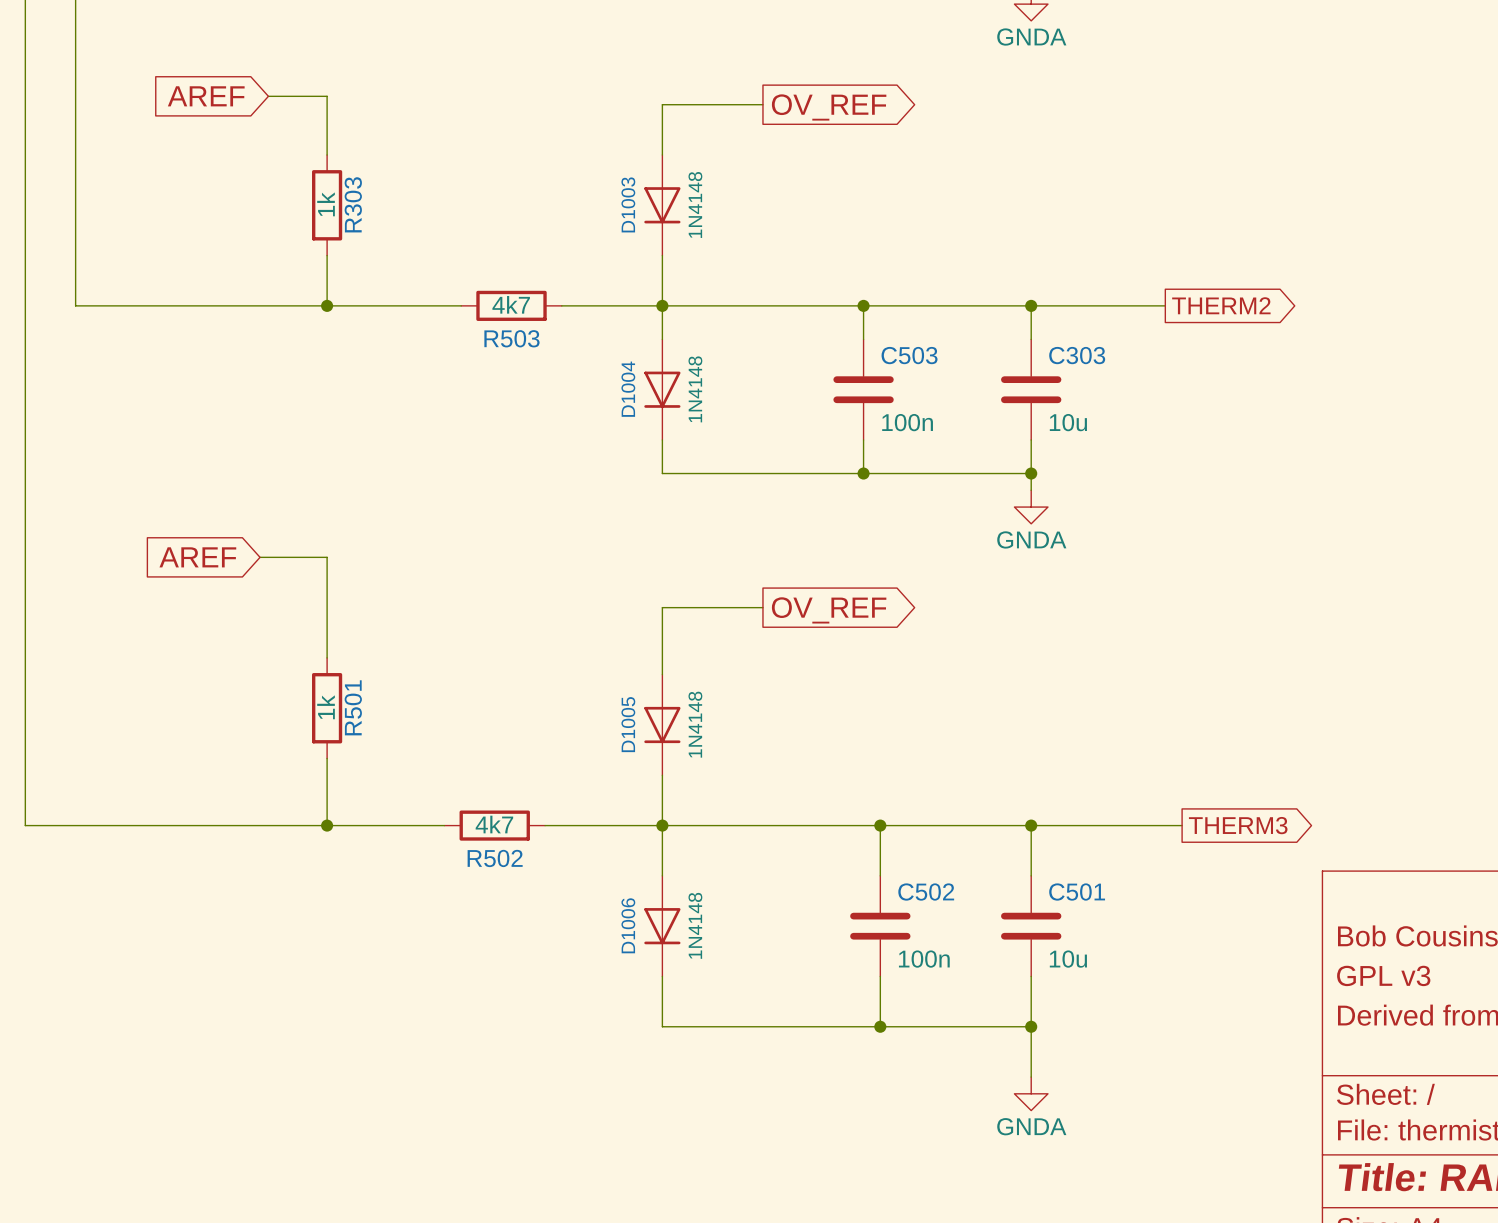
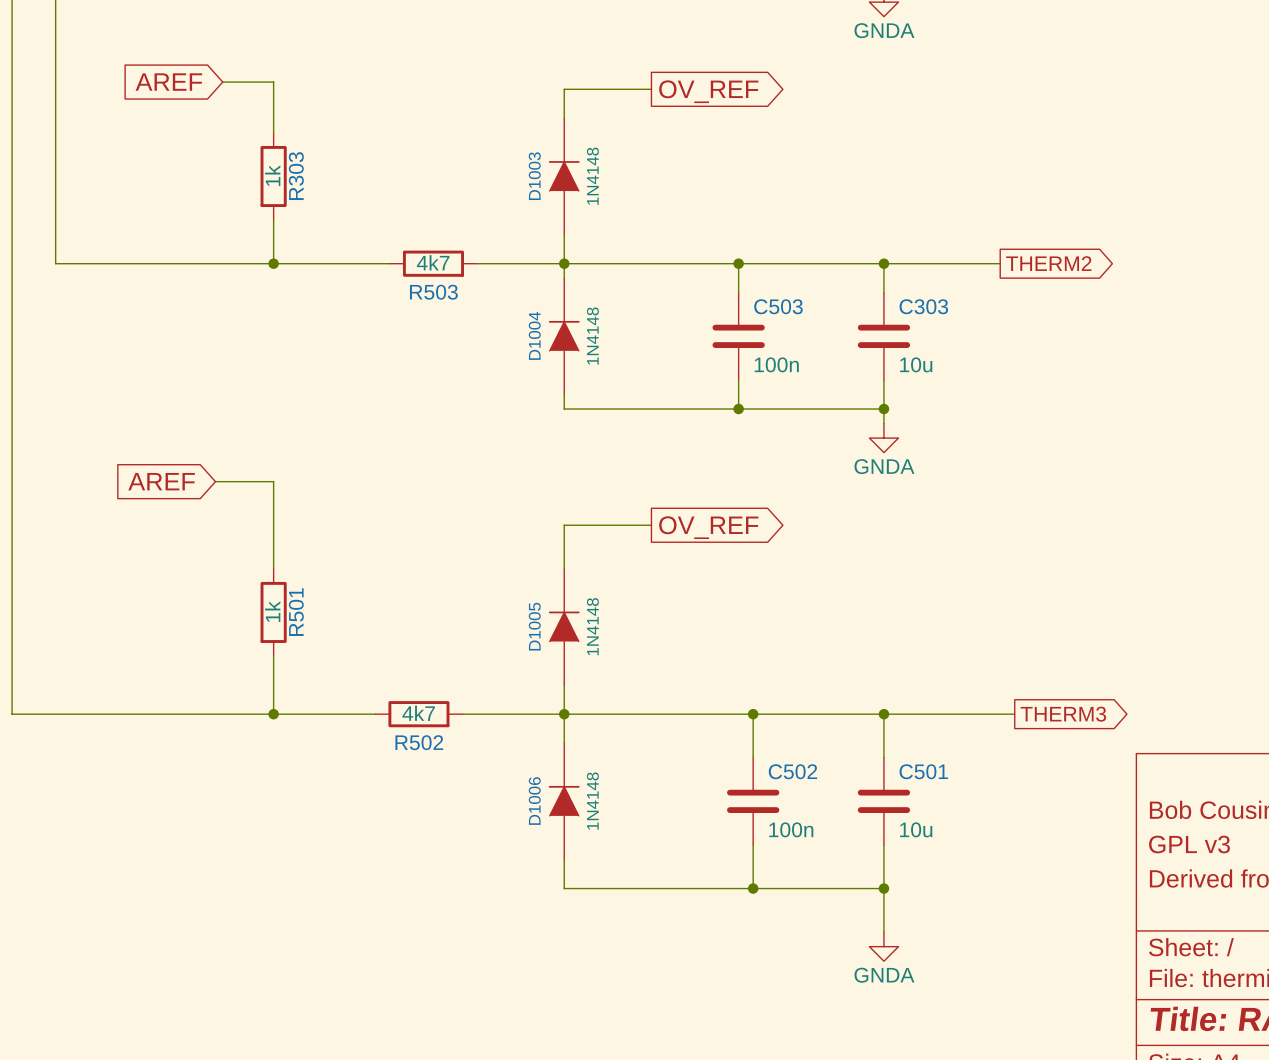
D1003 symbol: [644, 155, 681, 256] -> [548, 118, 580, 235]
D1004 symbol: [644, 339, 681, 441] -> [548, 278, 580, 395]
D1005 symbol: [644, 674, 681, 776] -> [548, 568, 580, 686]
D1006 symbol: [644, 875, 681, 977] -> [548, 743, 580, 860]

